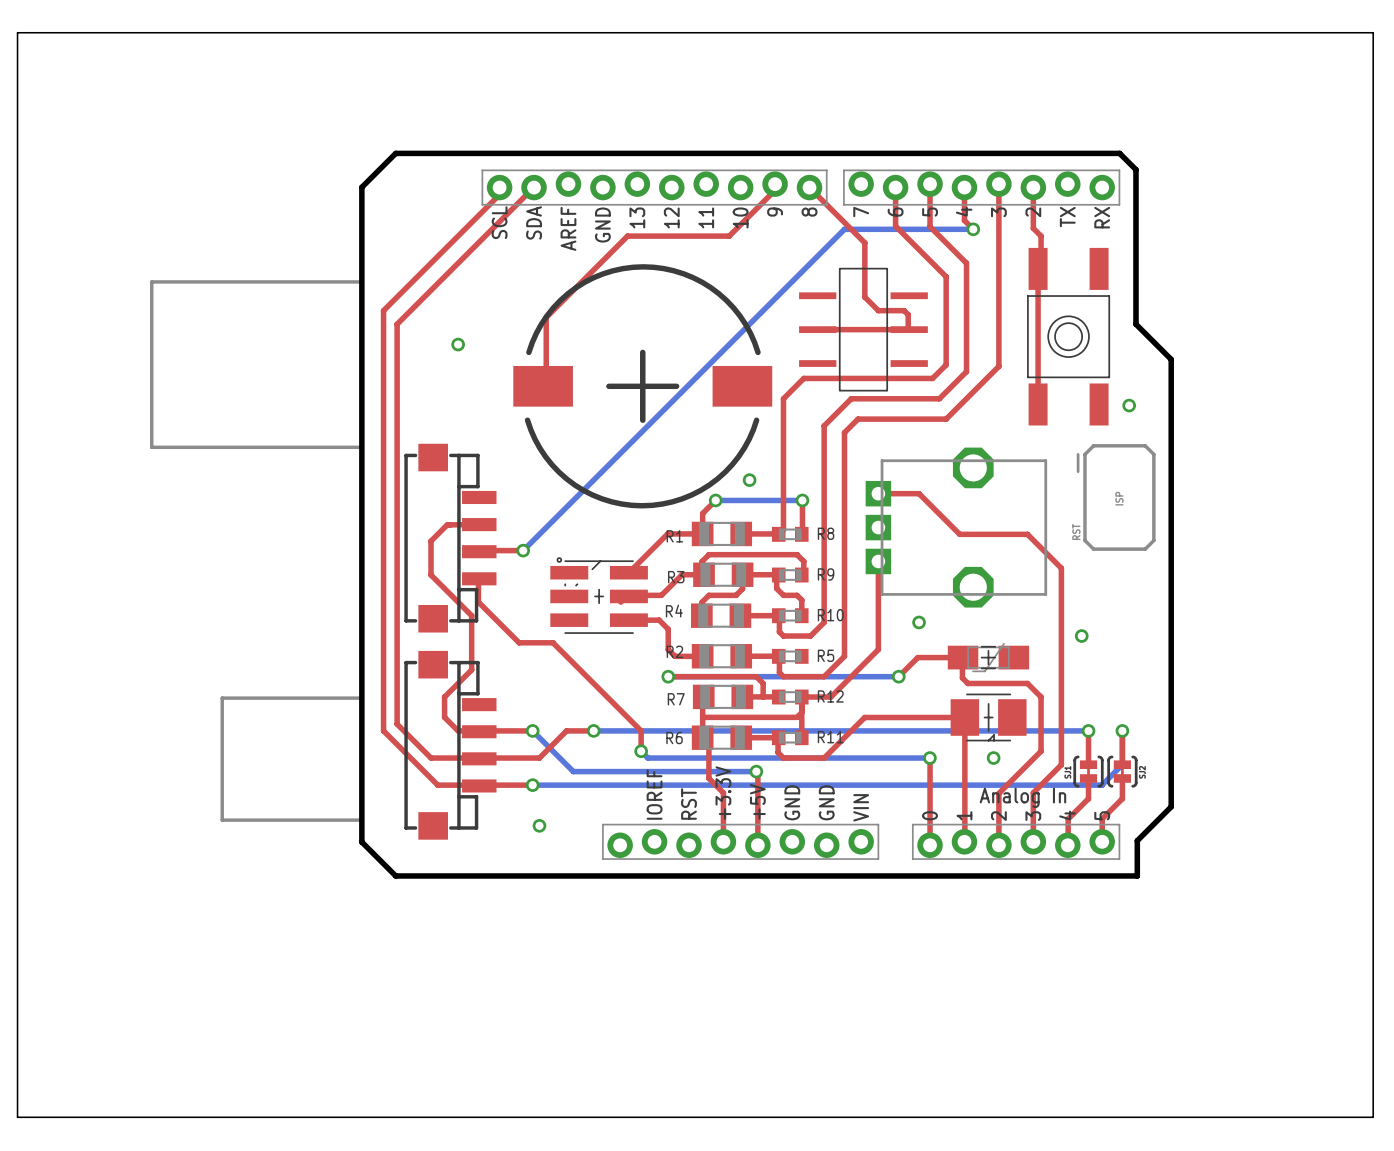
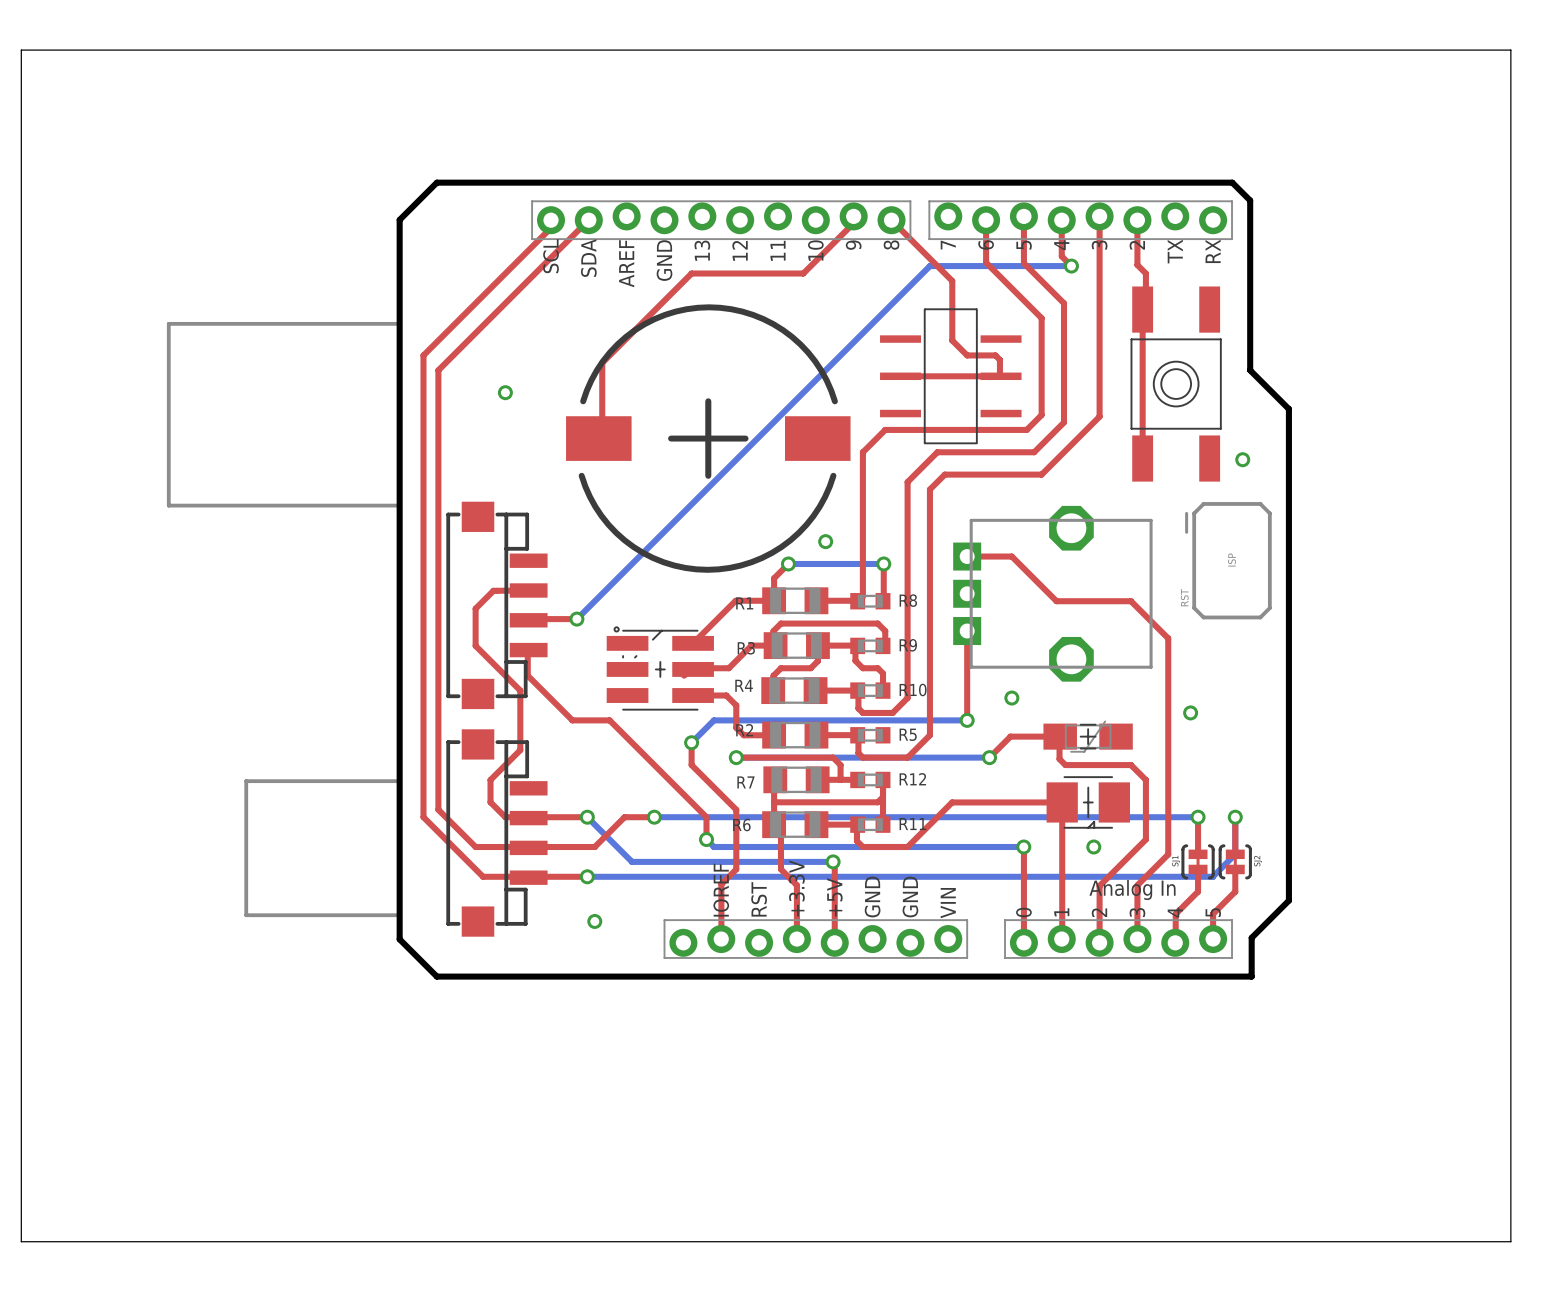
top track: (878, 642) (878, 649) (830, 697) (801, 697) -> none
bottom track: none -> (967, 720) (713, 720) (691, 742)
via: none -> (967, 720)
top track: none -> (691, 742) (691, 765) (736, 809) (736, 869) (721, 884) (721, 938)
via: none -> (691, 742)

